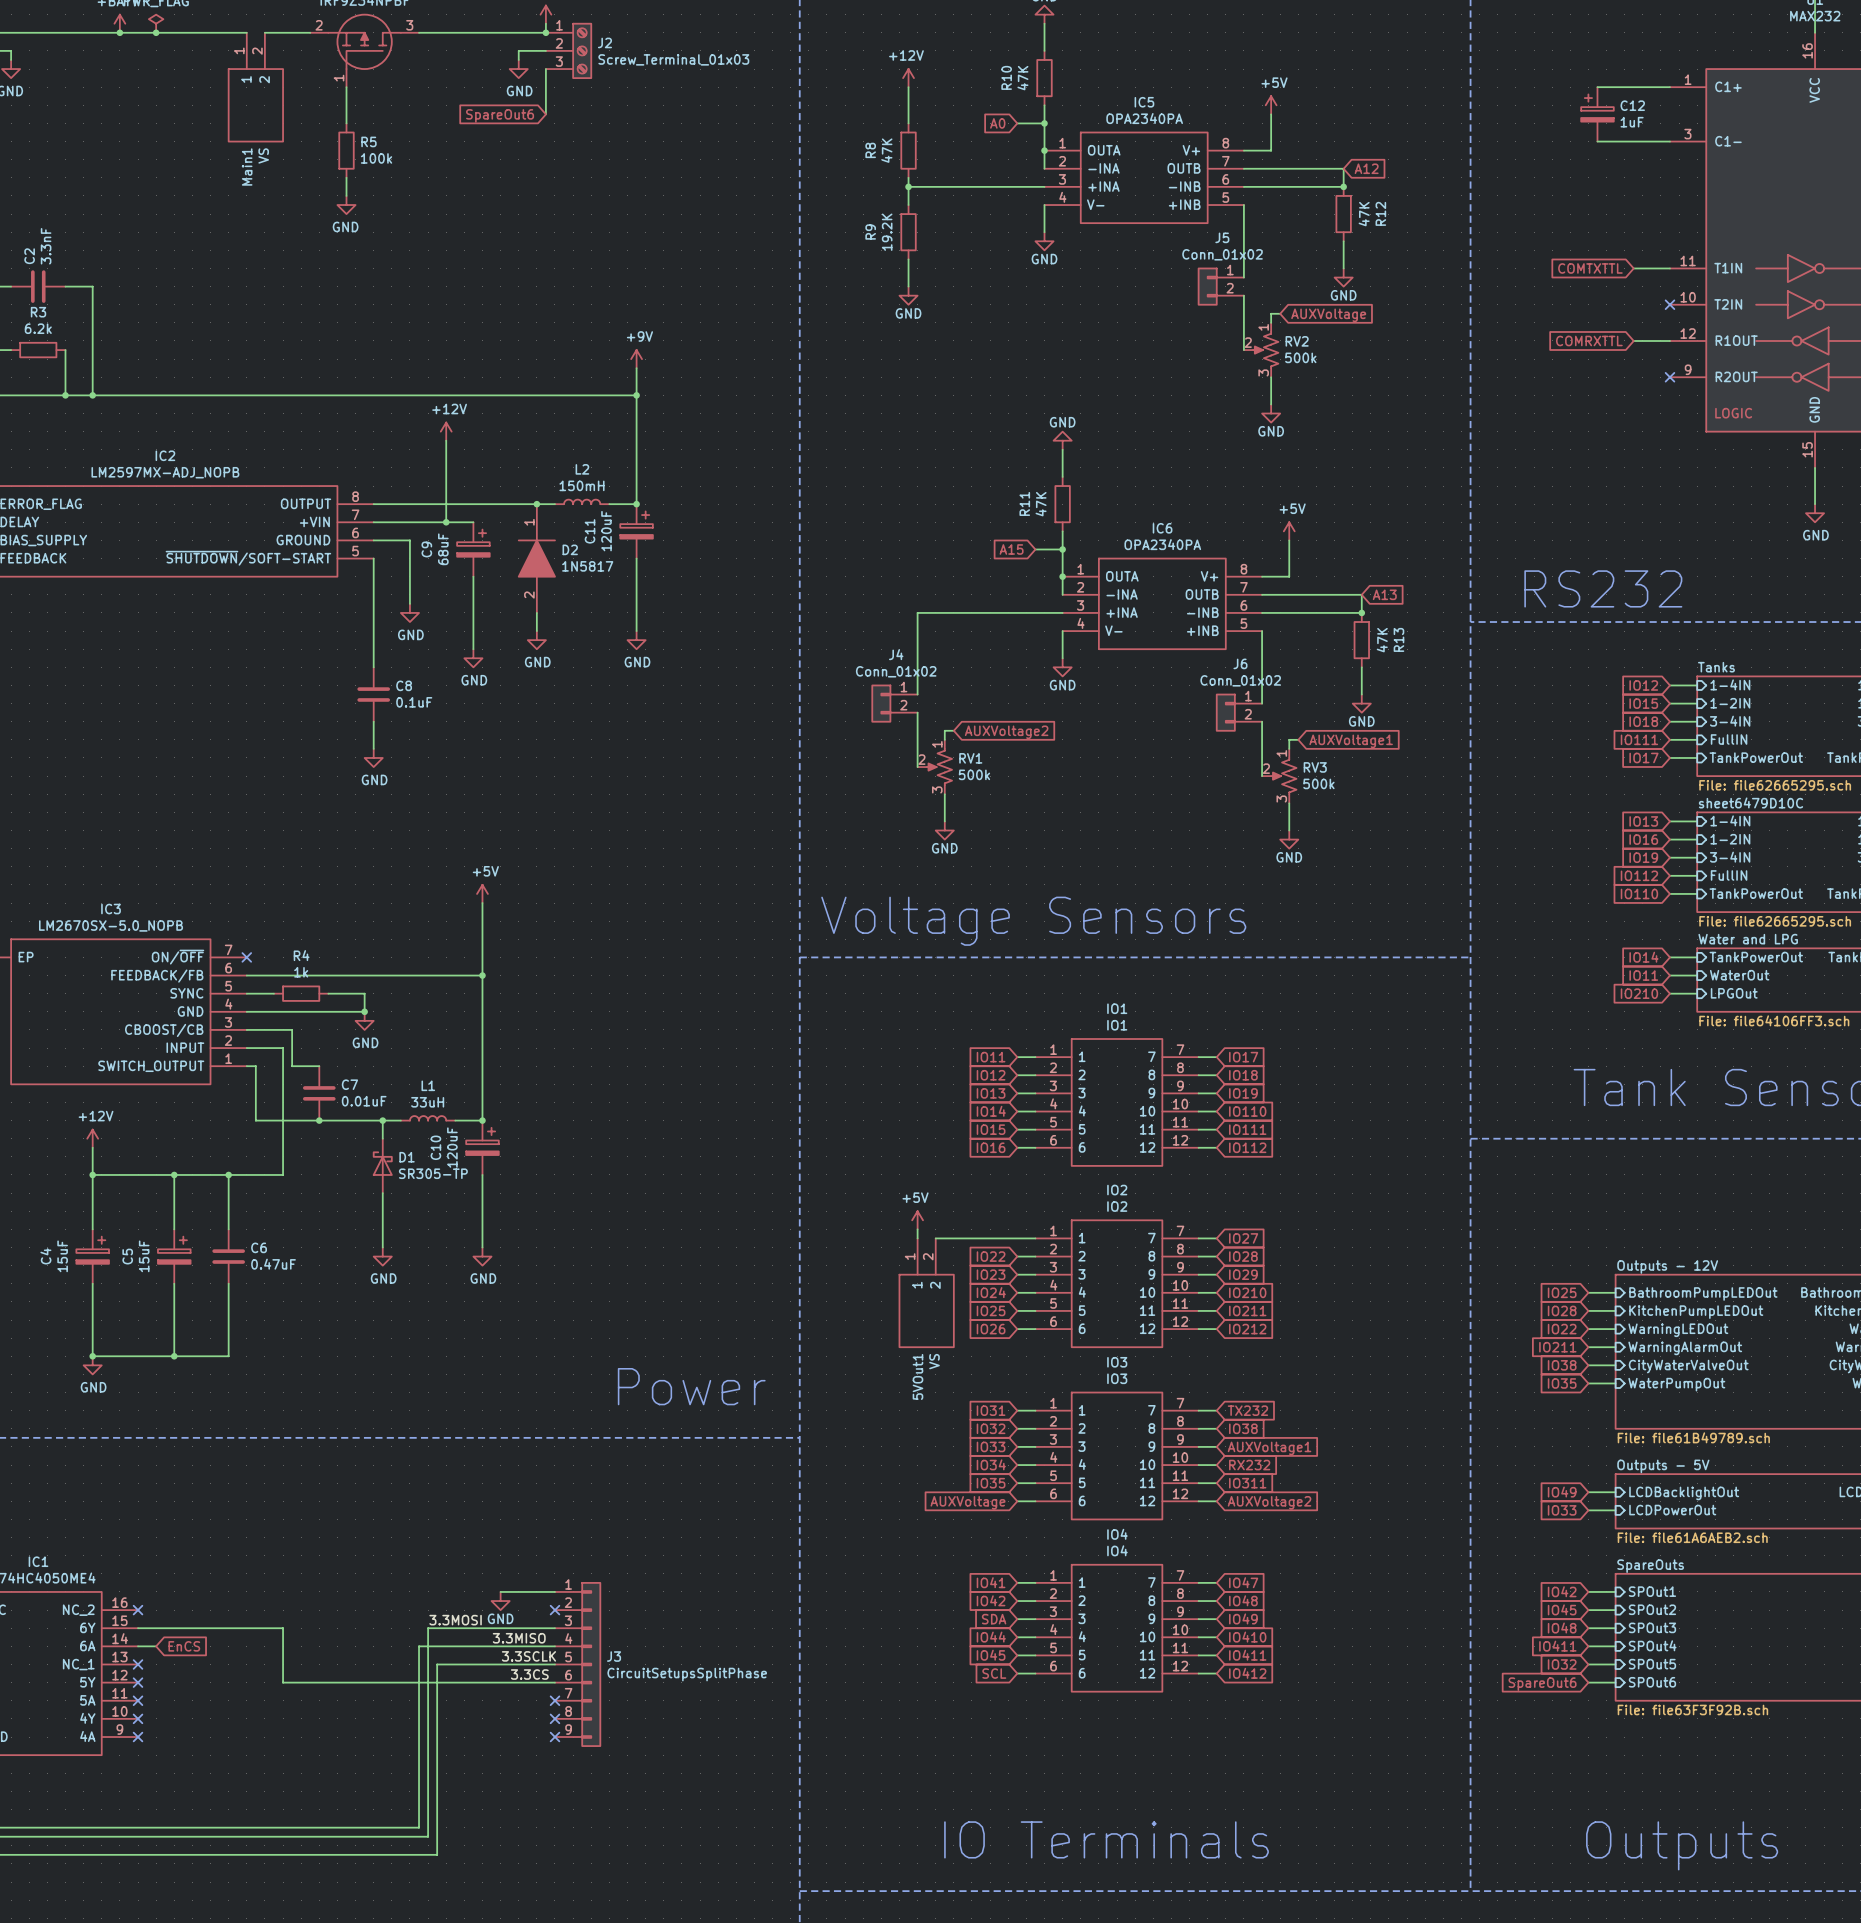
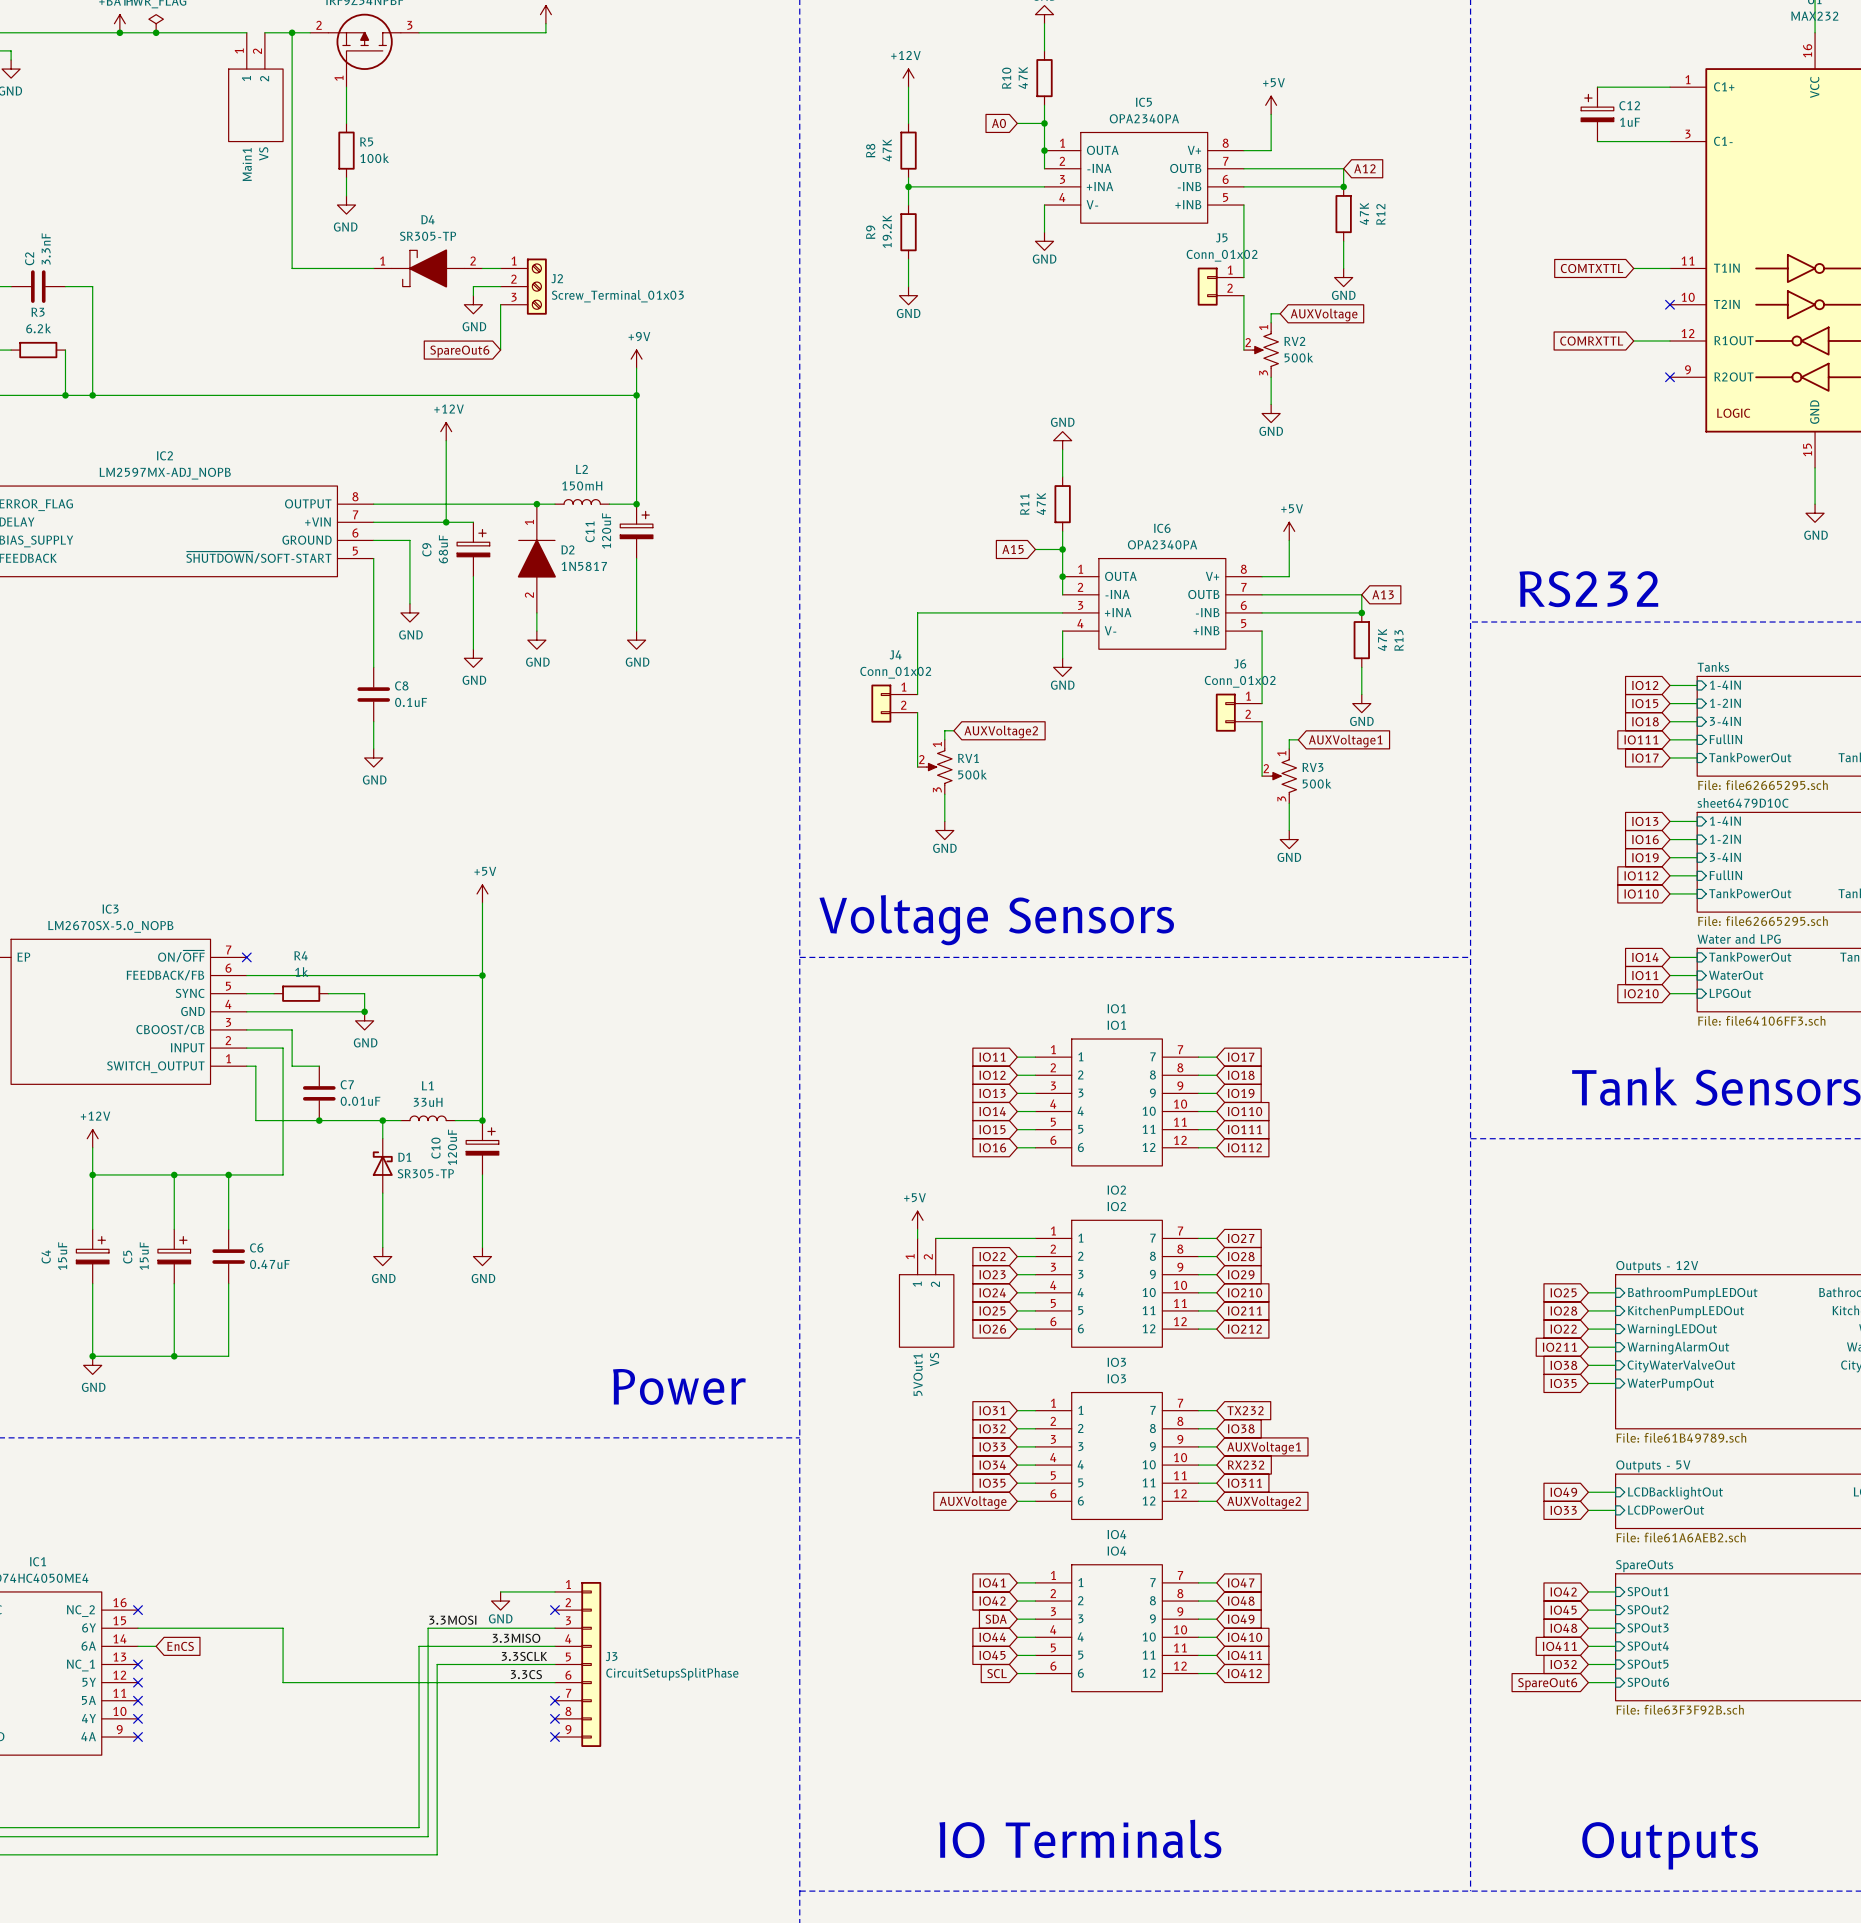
wire: none -> (292, 32) (292, 268) (373, 268)
junction: none -> (292, 32)
junction: (545, 32) -> none
wire: (545, 50) (518, 50) (518, 59) -> none
J2 position: (569, 50) -> (523, 286)
power symbol: GND (518, 69) -> none
wire: (545, 69) (545, 114) -> none
global label: SpareOut6 (500, 115) -> none
D4: none -> SR305-TP (428, 268)
wire: none -> (482, 268) (500, 268)
wire: none -> (500, 286) (473, 286) (473, 295)
power symbol: none -> GND (473, 304)
wire: none -> (500, 304) (500, 350)
global label: none -> SpareOut6 (459, 351)

